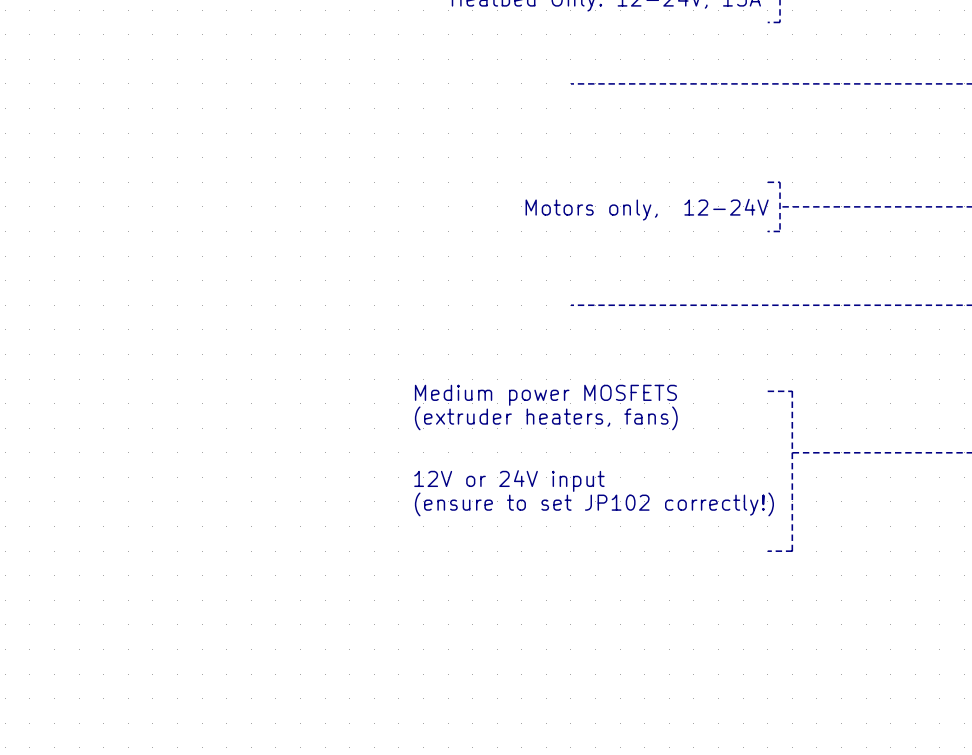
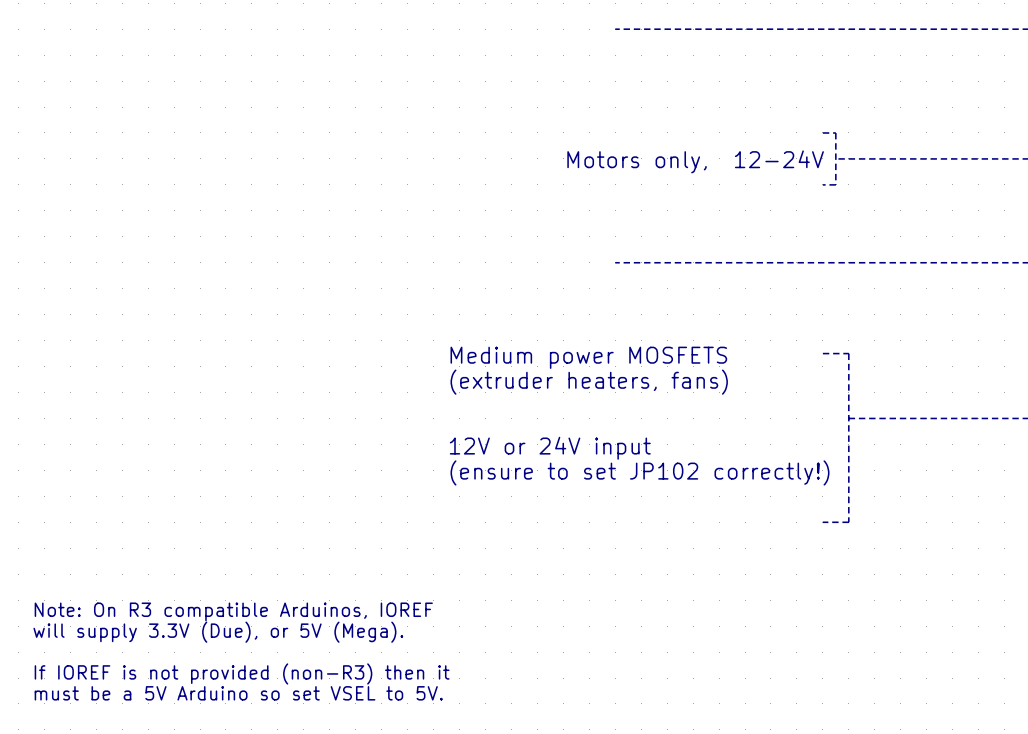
text: none -> Note: On R3 compatible Arduinos, IOREF (233, 611)
text: none -> will supply 3.3V (Due), or 5V (Mega). (218, 632)
text: none -> If IOREF is not provided (non-R3) then it (242, 673)
text: none -> must be a 5V Arduino so set VSEL to 5V. (238, 693)

